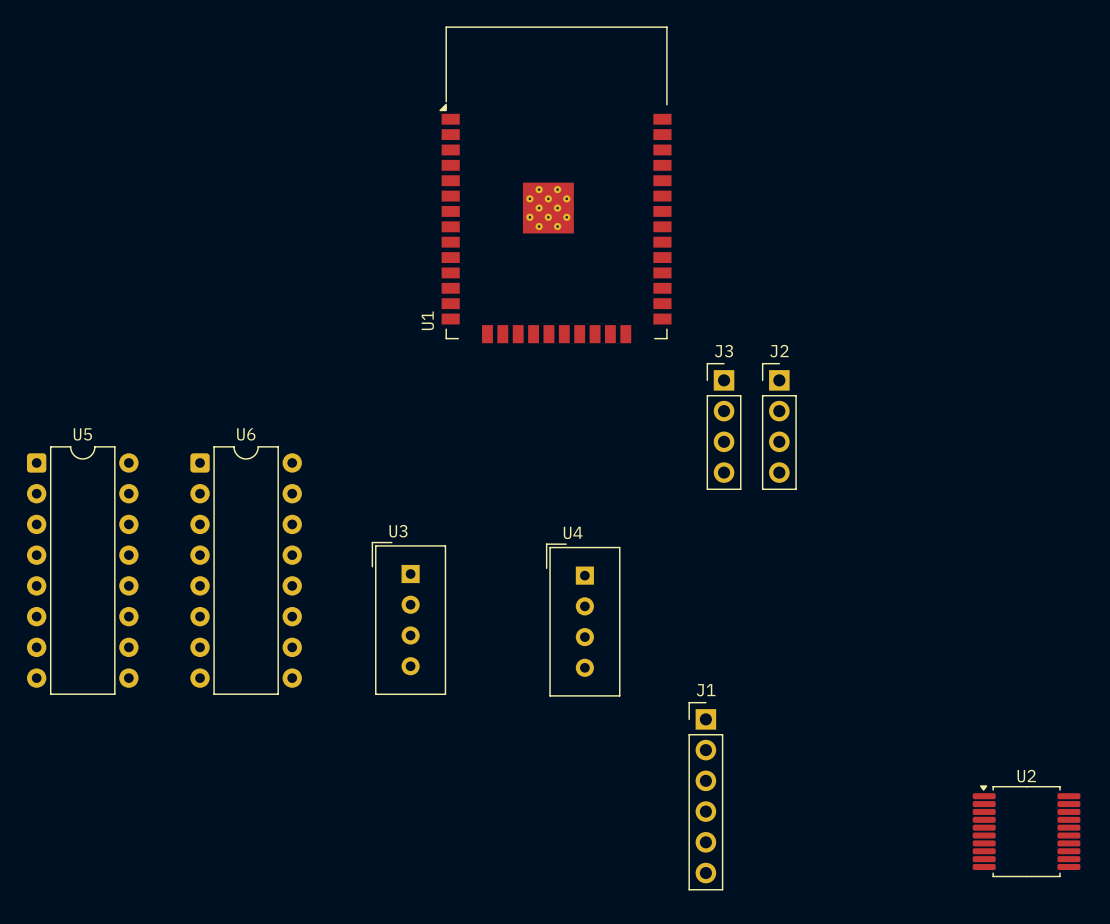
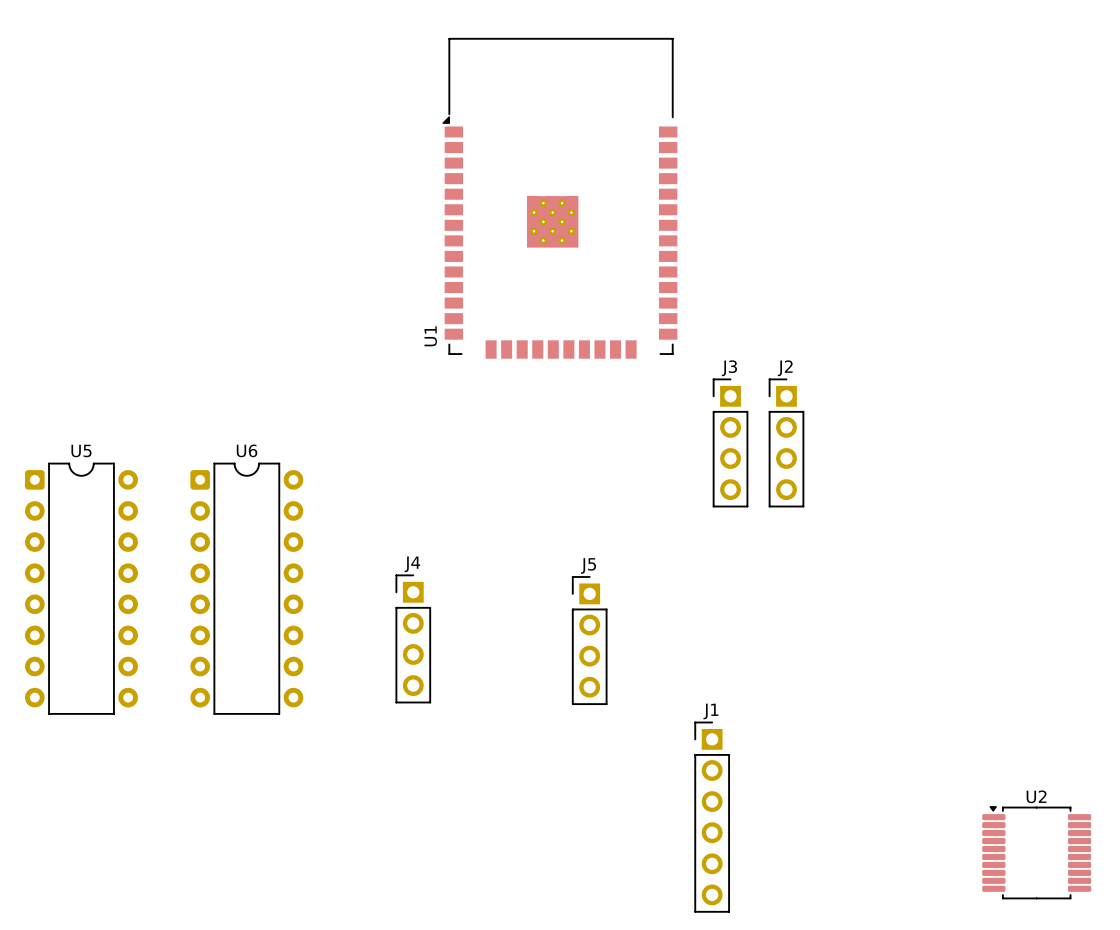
U3: (408, 618) -> none
J4: none -> (413, 638)
U4: (583, 620) -> none
J5: none -> (589, 640)

